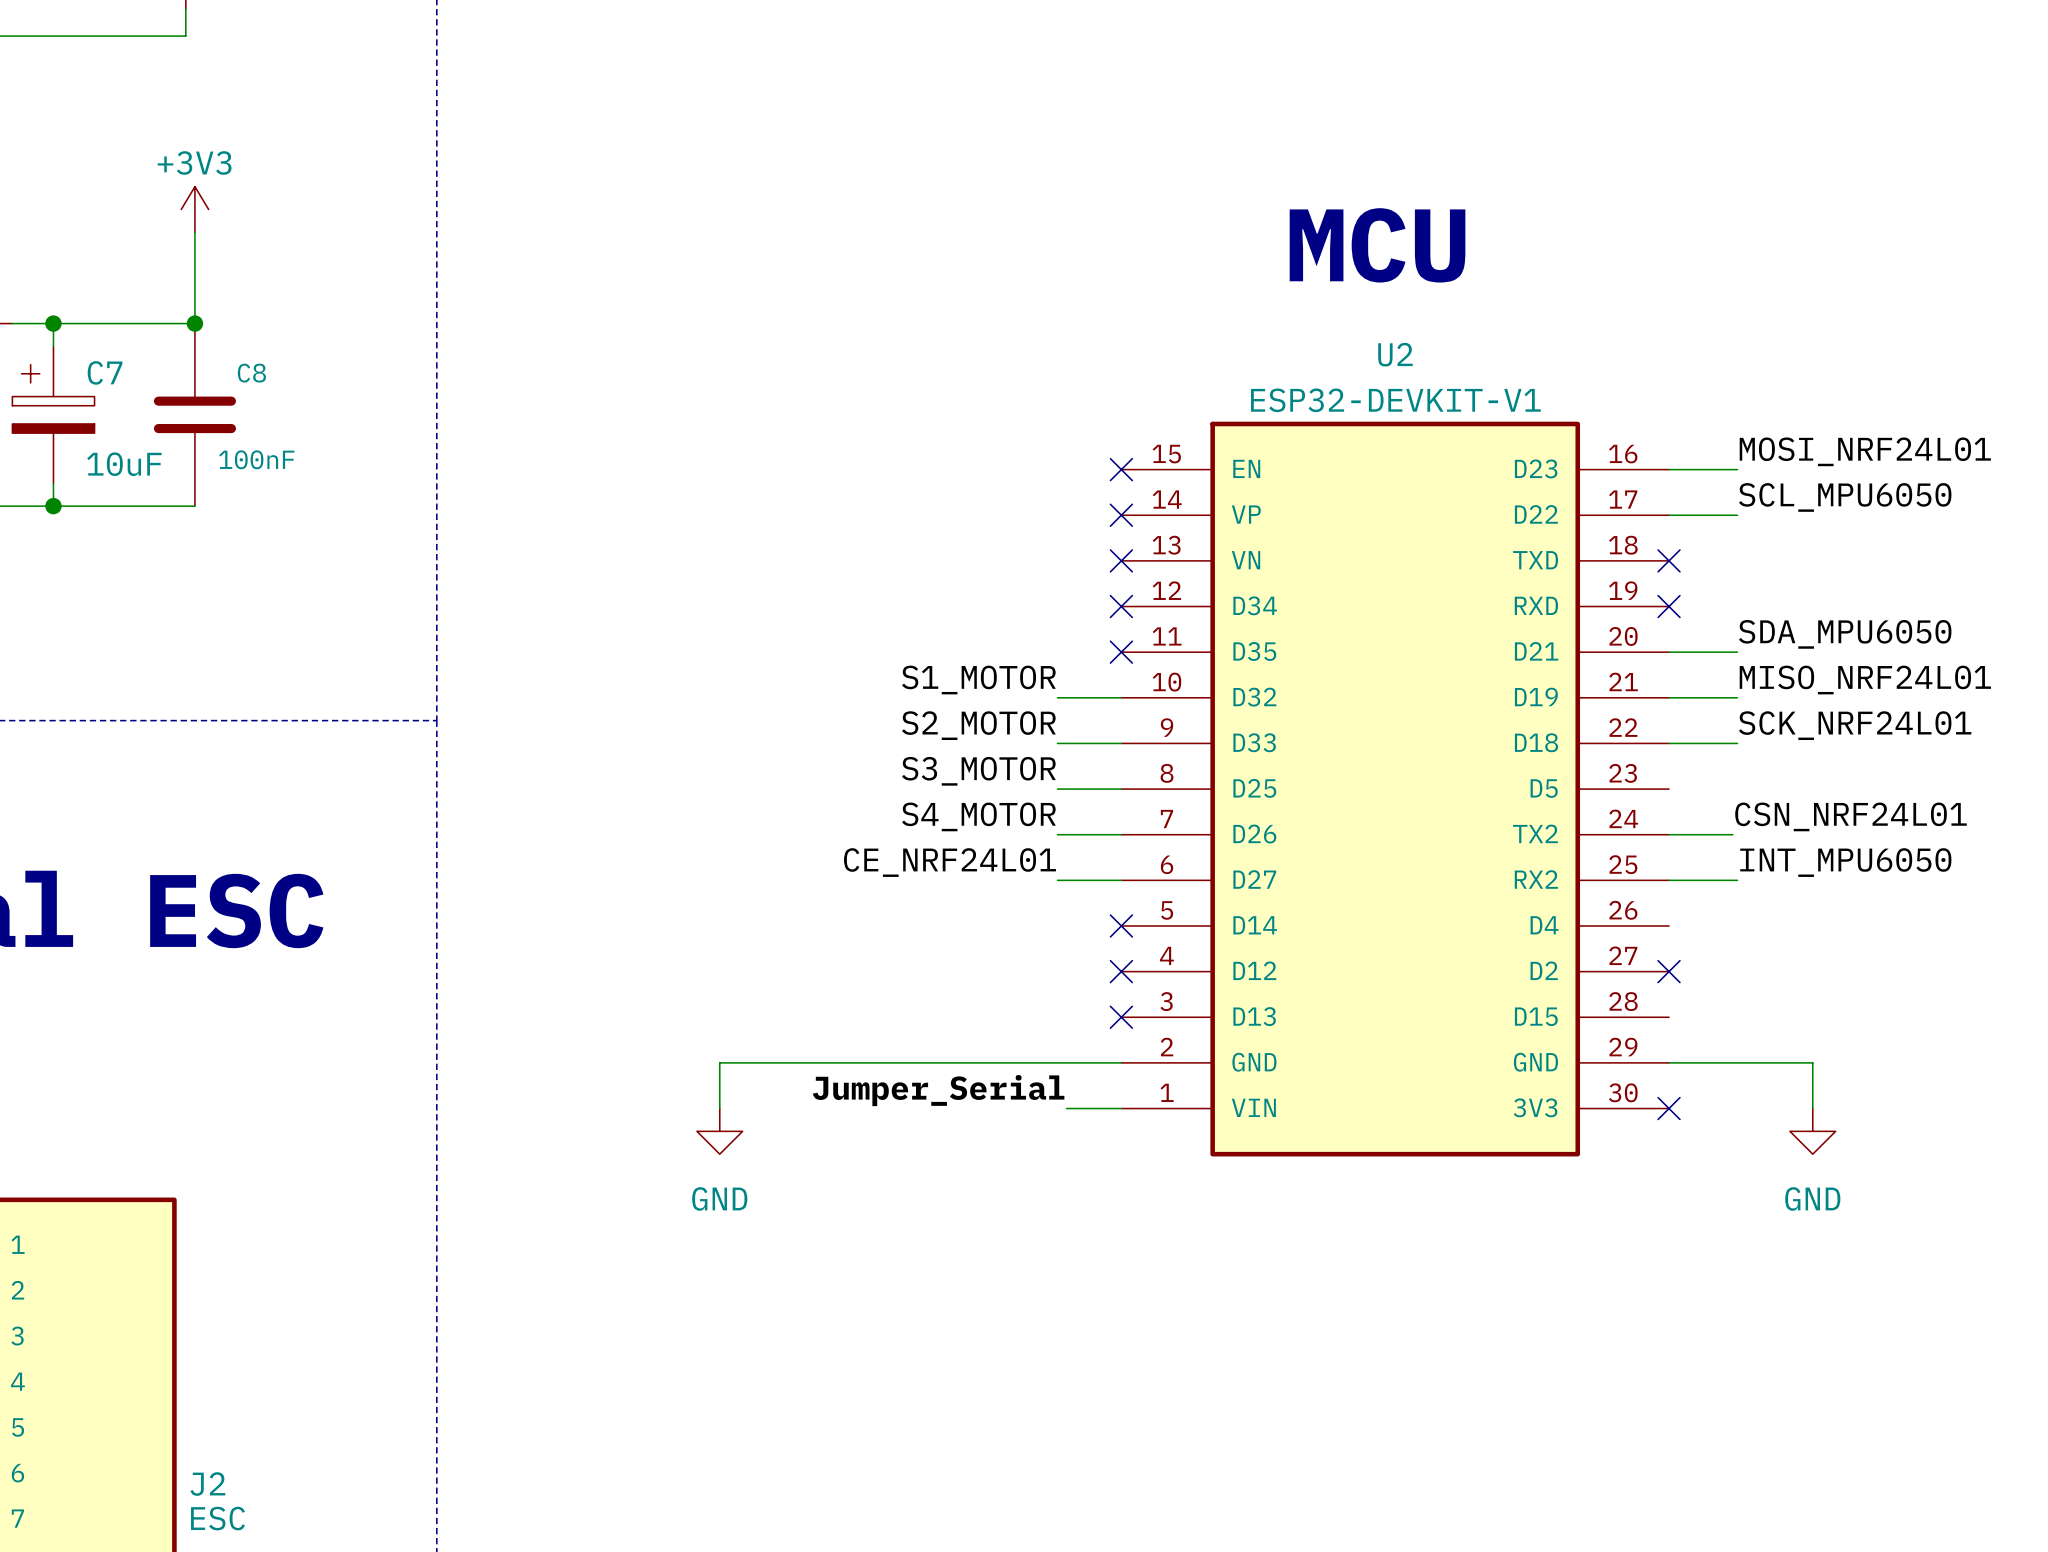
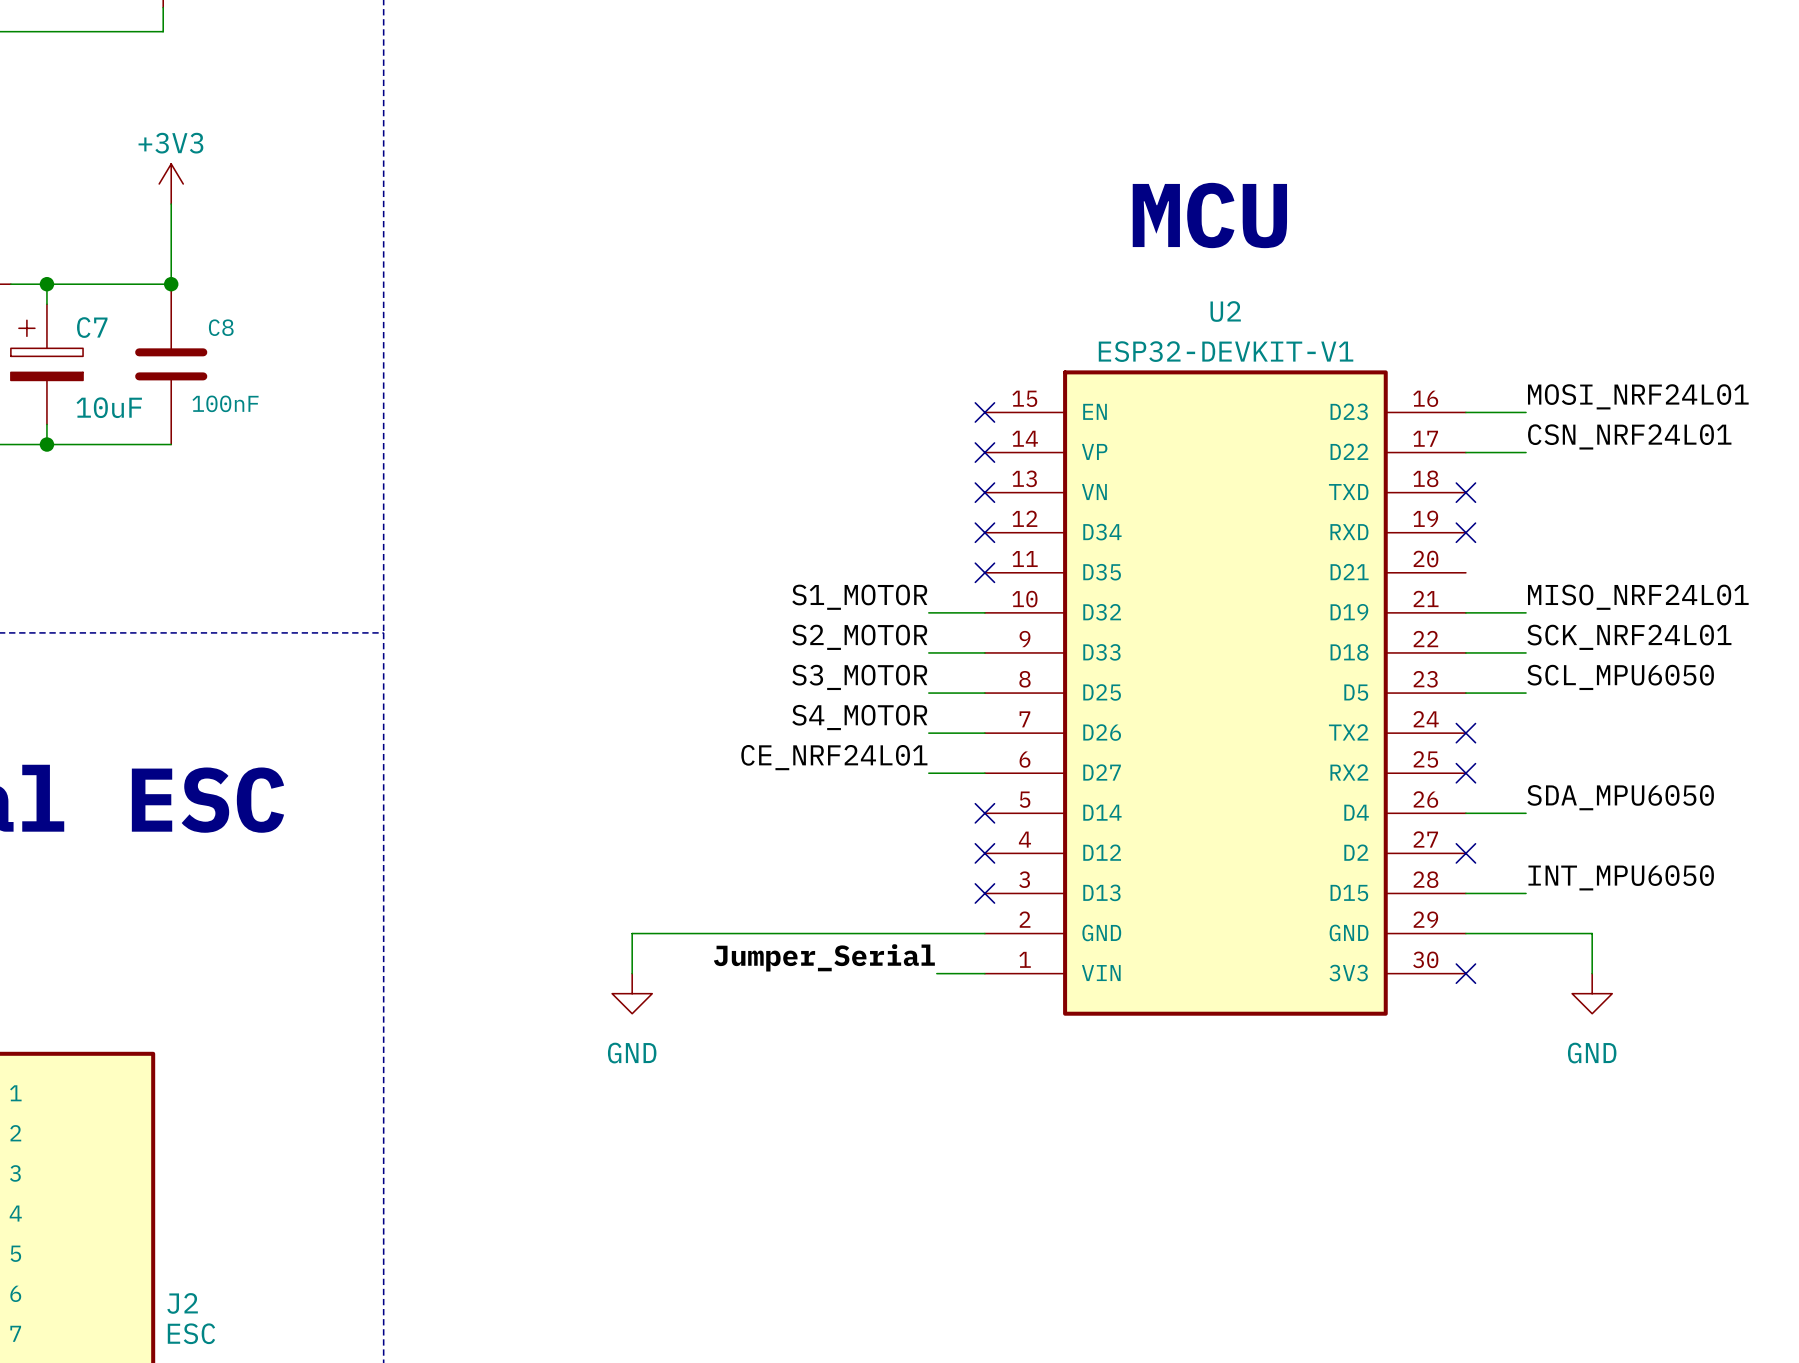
label: SCL_MPU6050 (1845, 497) -> CSN_NRF24L01 (1629, 436)
label position: SDA_MPU6050 (1845, 634) -> SDA_MPU6050 (1620, 797)
wire: (1669, 652) (1737, 652) -> (1465, 693) (1526, 693)
label: none -> SCL_MPU6050 (1620, 677)
label: CSN_NRF24L01 (1850, 816) -> none
wire: (1669, 834) (1732, 834) -> none
no-connect mark: none -> (1465, 733)
label position: INT_MPU6050 (1845, 862) -> INT_MPU6050 (1621, 877)
wire: (1669, 880) (1737, 880) -> (1465, 813) (1526, 813)
no-connect mark: none -> (1465, 773)
wire: none -> (1465, 893) (1526, 893)

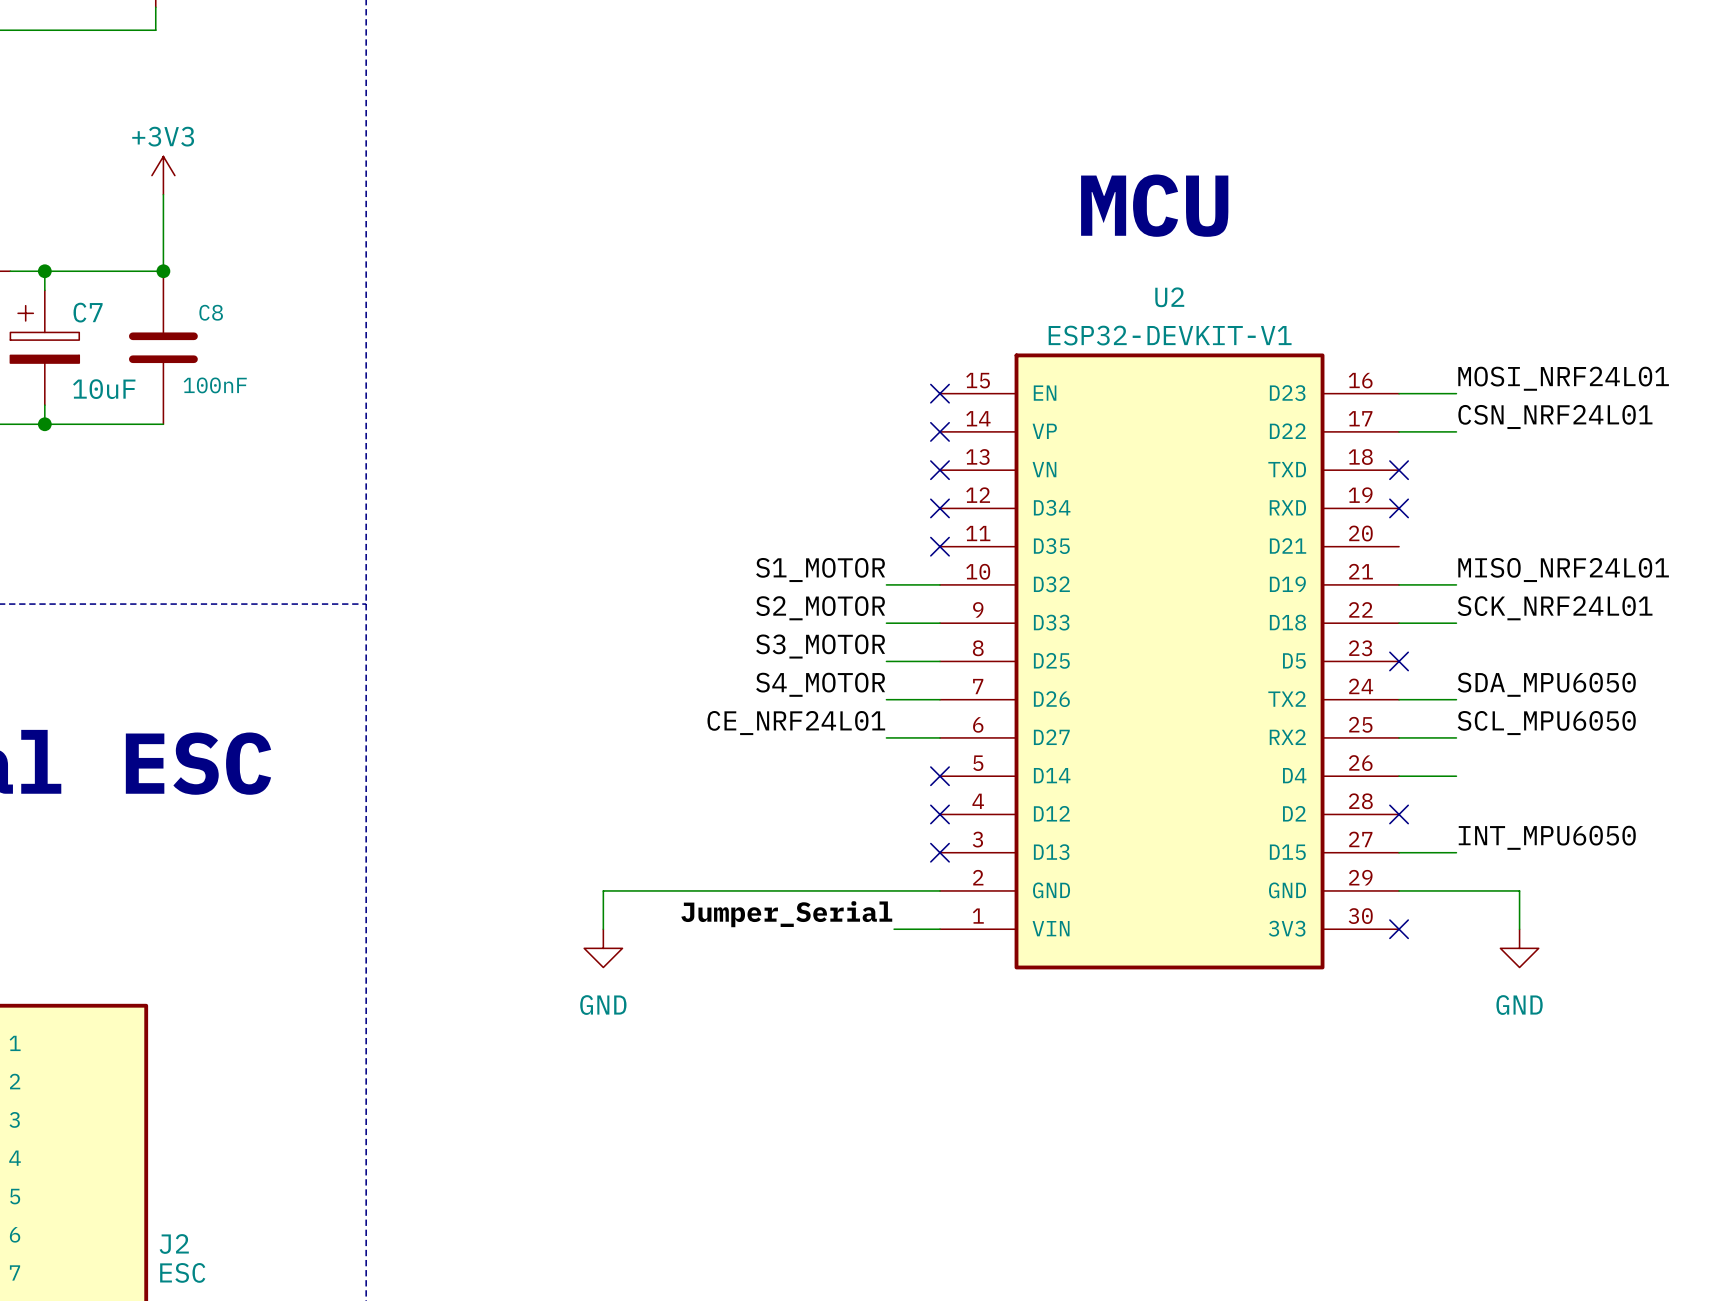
label position: SCL_MPU6050 (1620, 677) -> SCL_MPU6050 (1546, 723)
wire: (1465, 693) (1526, 693) -> (1399, 699) (1456, 699)
no-connect mark: none -> (1399, 661)
no-connect mark: (1465, 733) -> none
wire: none -> (1399, 737) (1456, 737)
no-connect mark: (1465, 773) -> none
label position: SDA_MPU6050 (1620, 797) -> SDA_MPU6050 (1546, 684)
U2 pin number: 27 (1425, 839) -> 28 (1360, 801)
U2 pin number: 28 (1425, 879) -> 27 (1360, 839)

